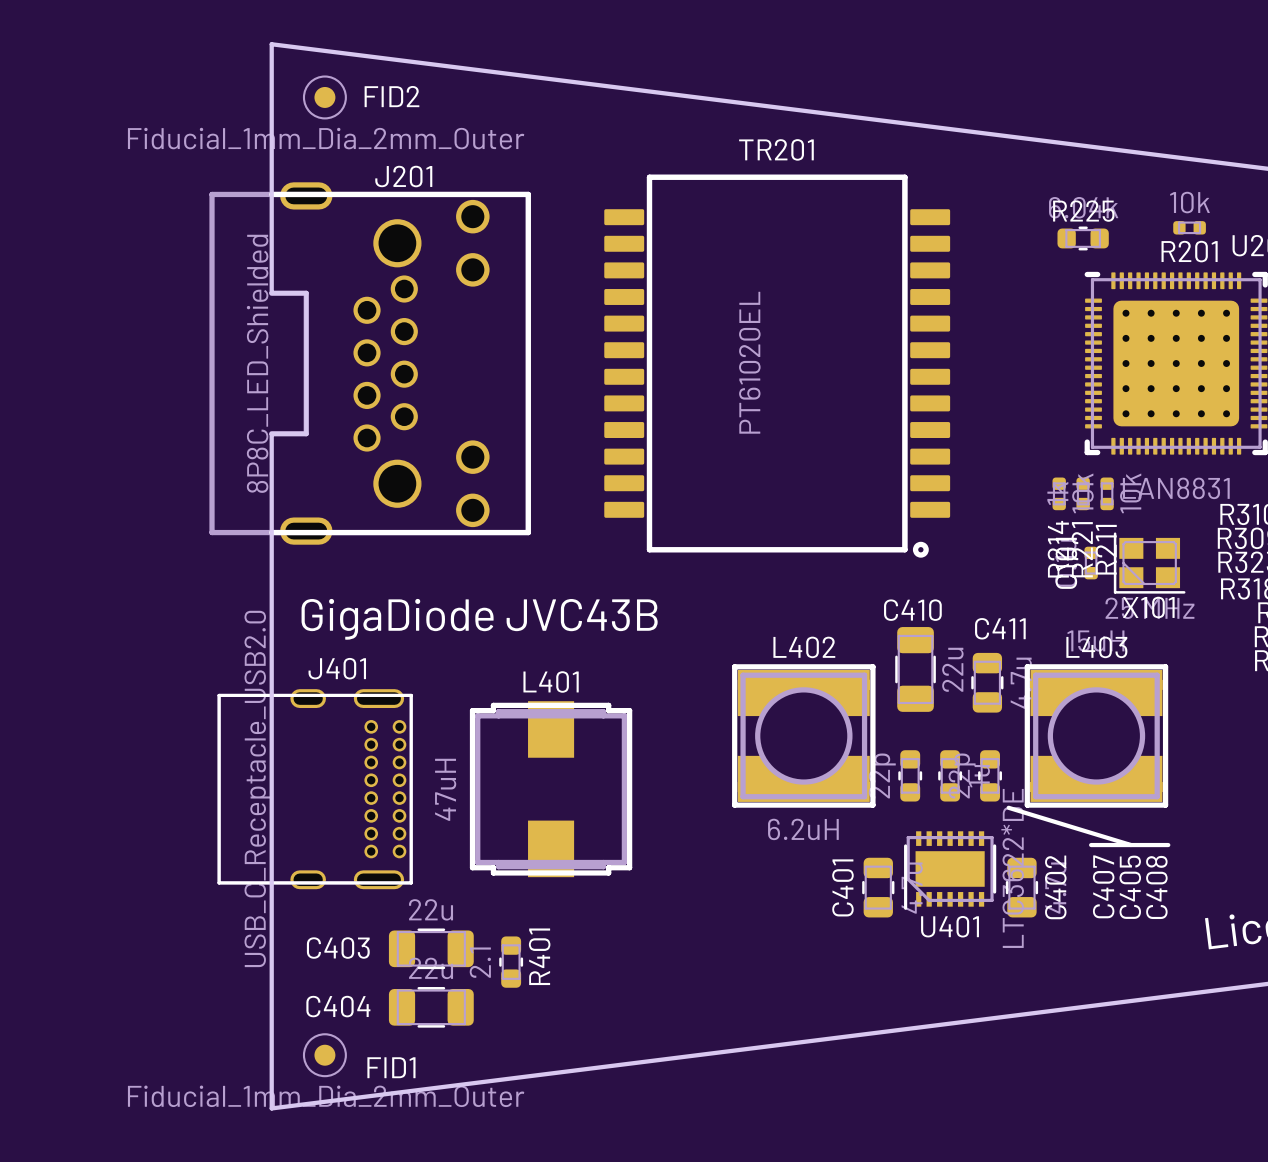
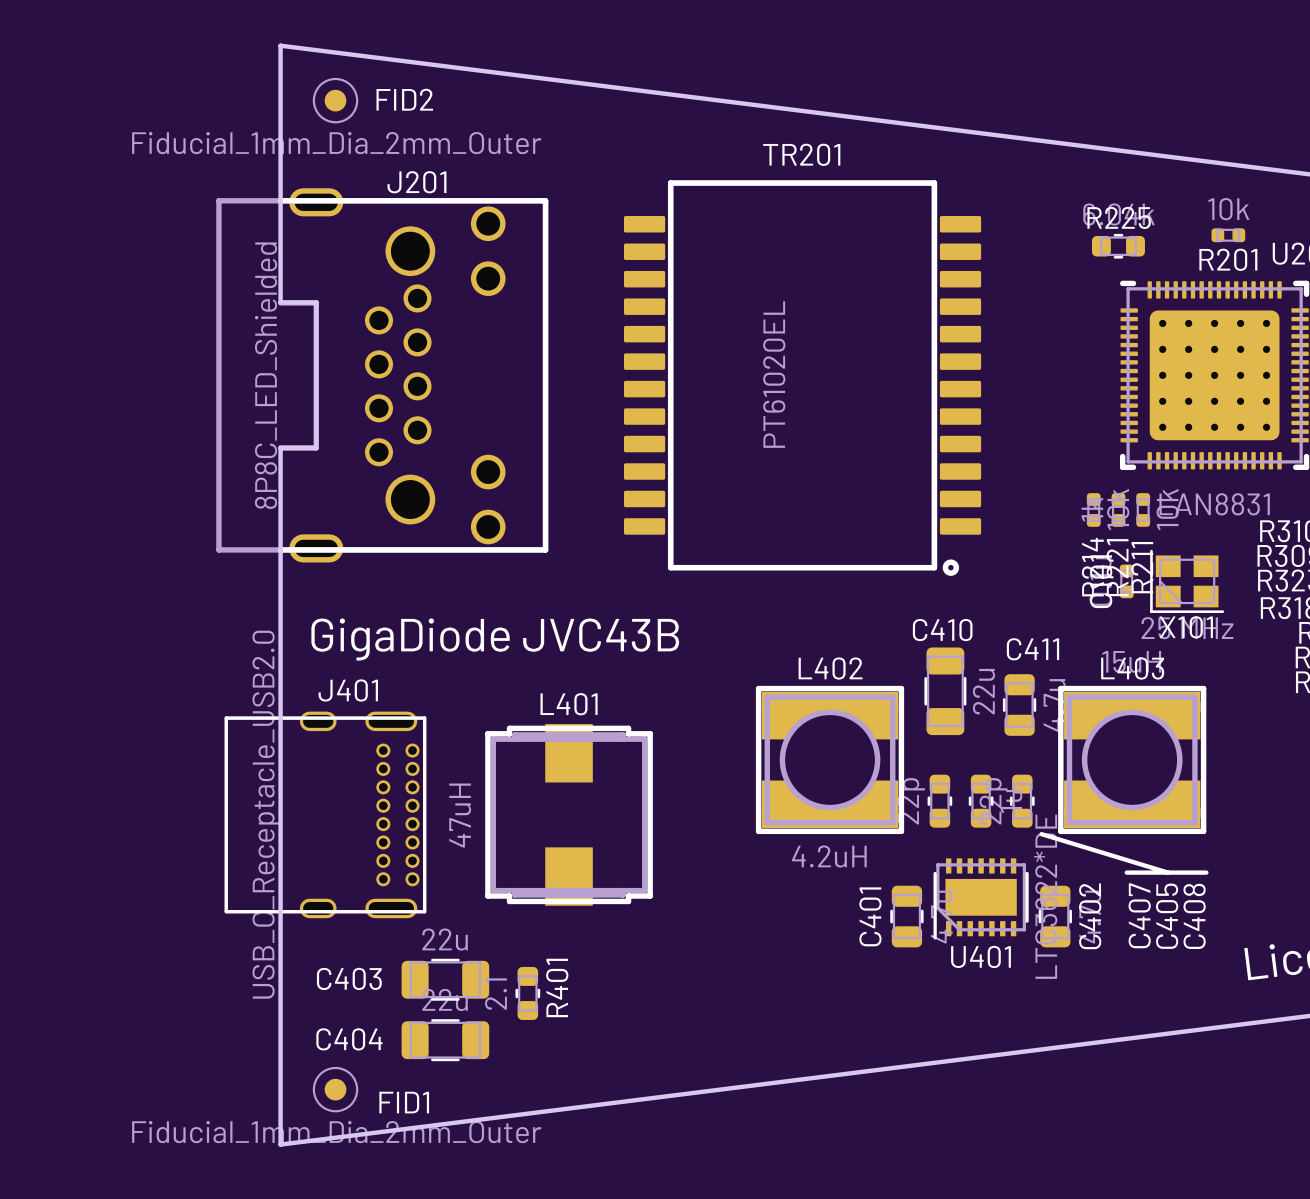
L402 value: 6.2uH (803, 829) -> 4.2uH (829, 856)

